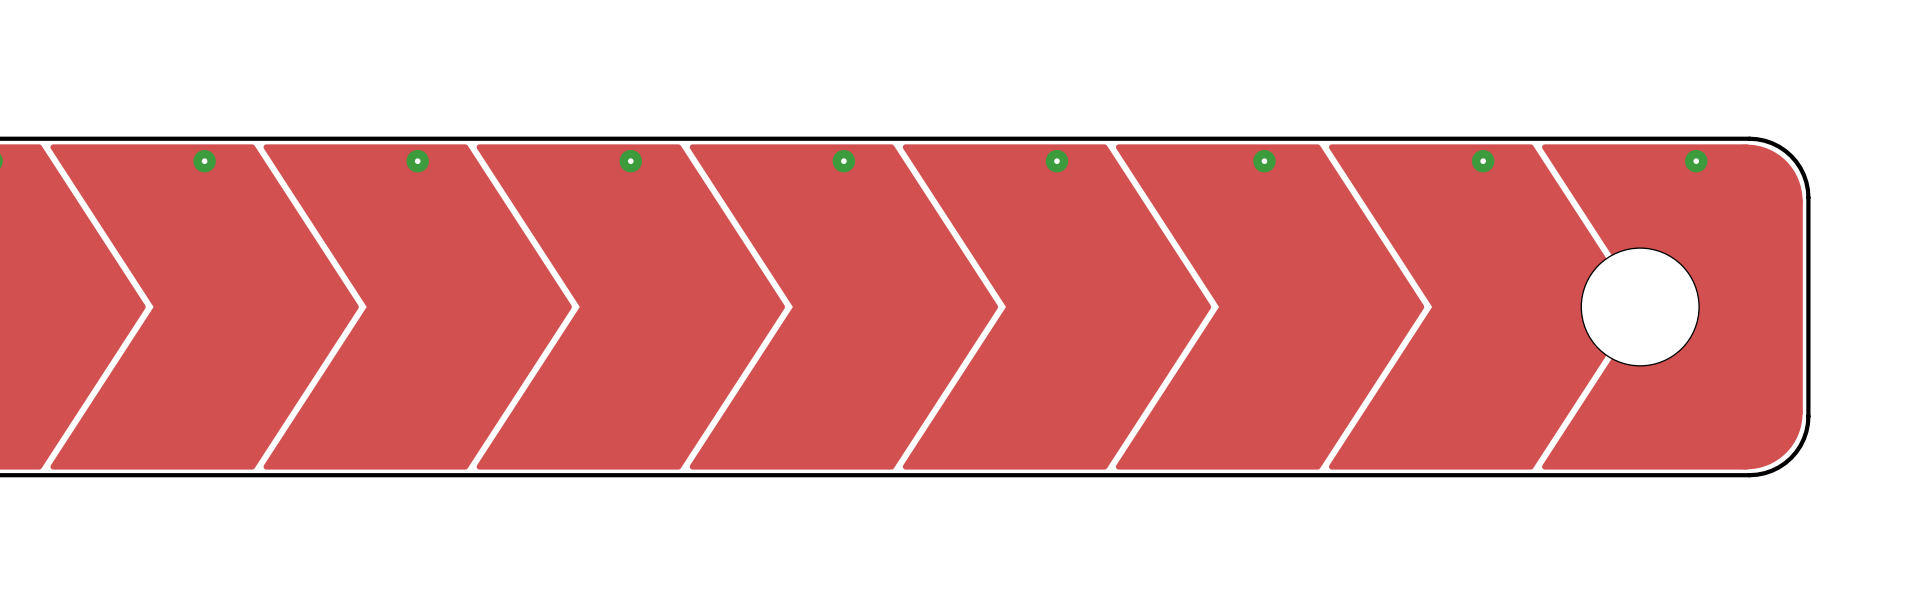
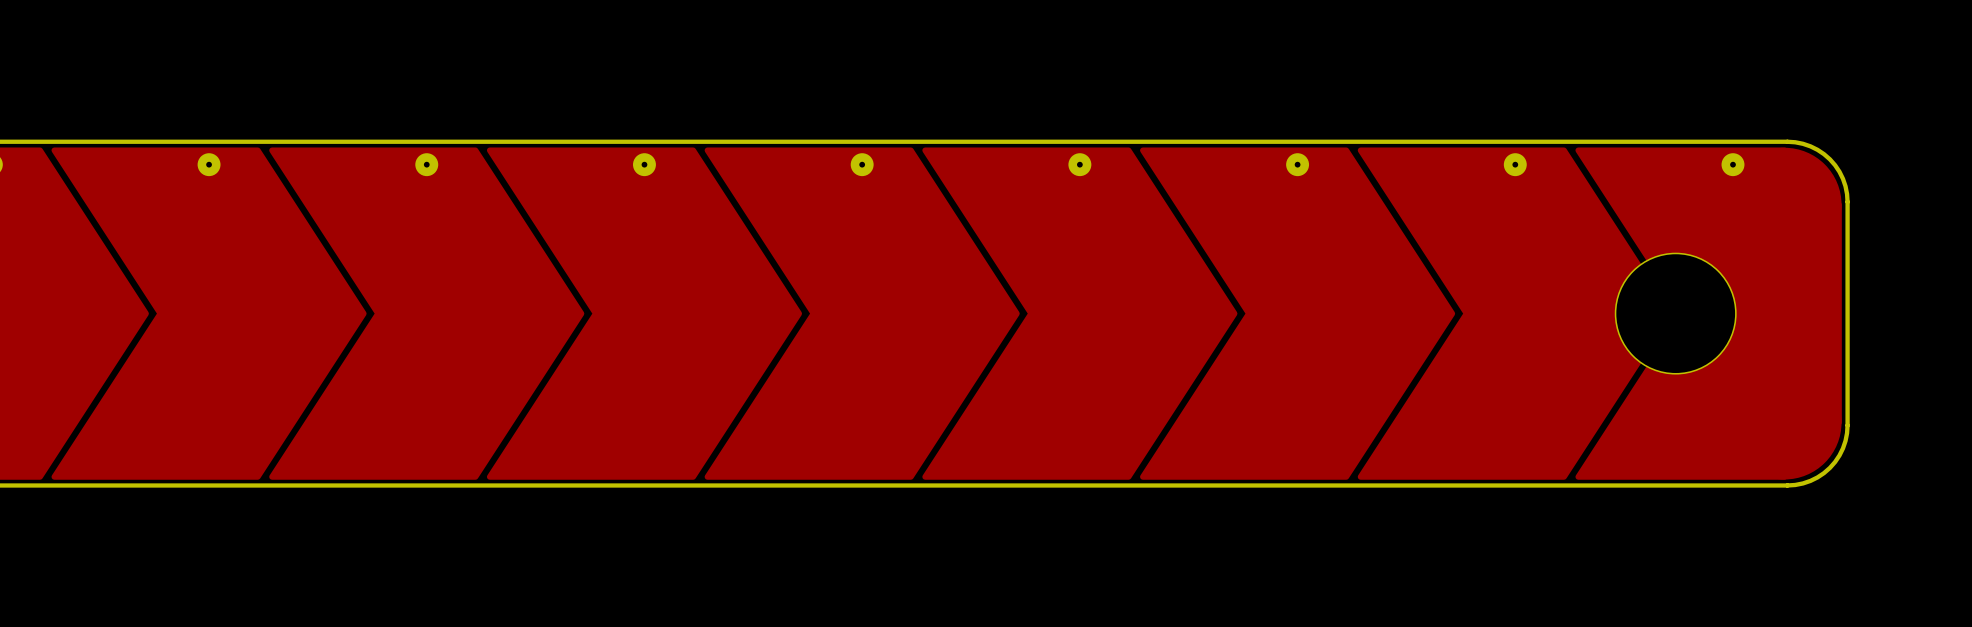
part footprint: [1115, 144, 1425, 470] -> [1140, 147, 1456, 480]

